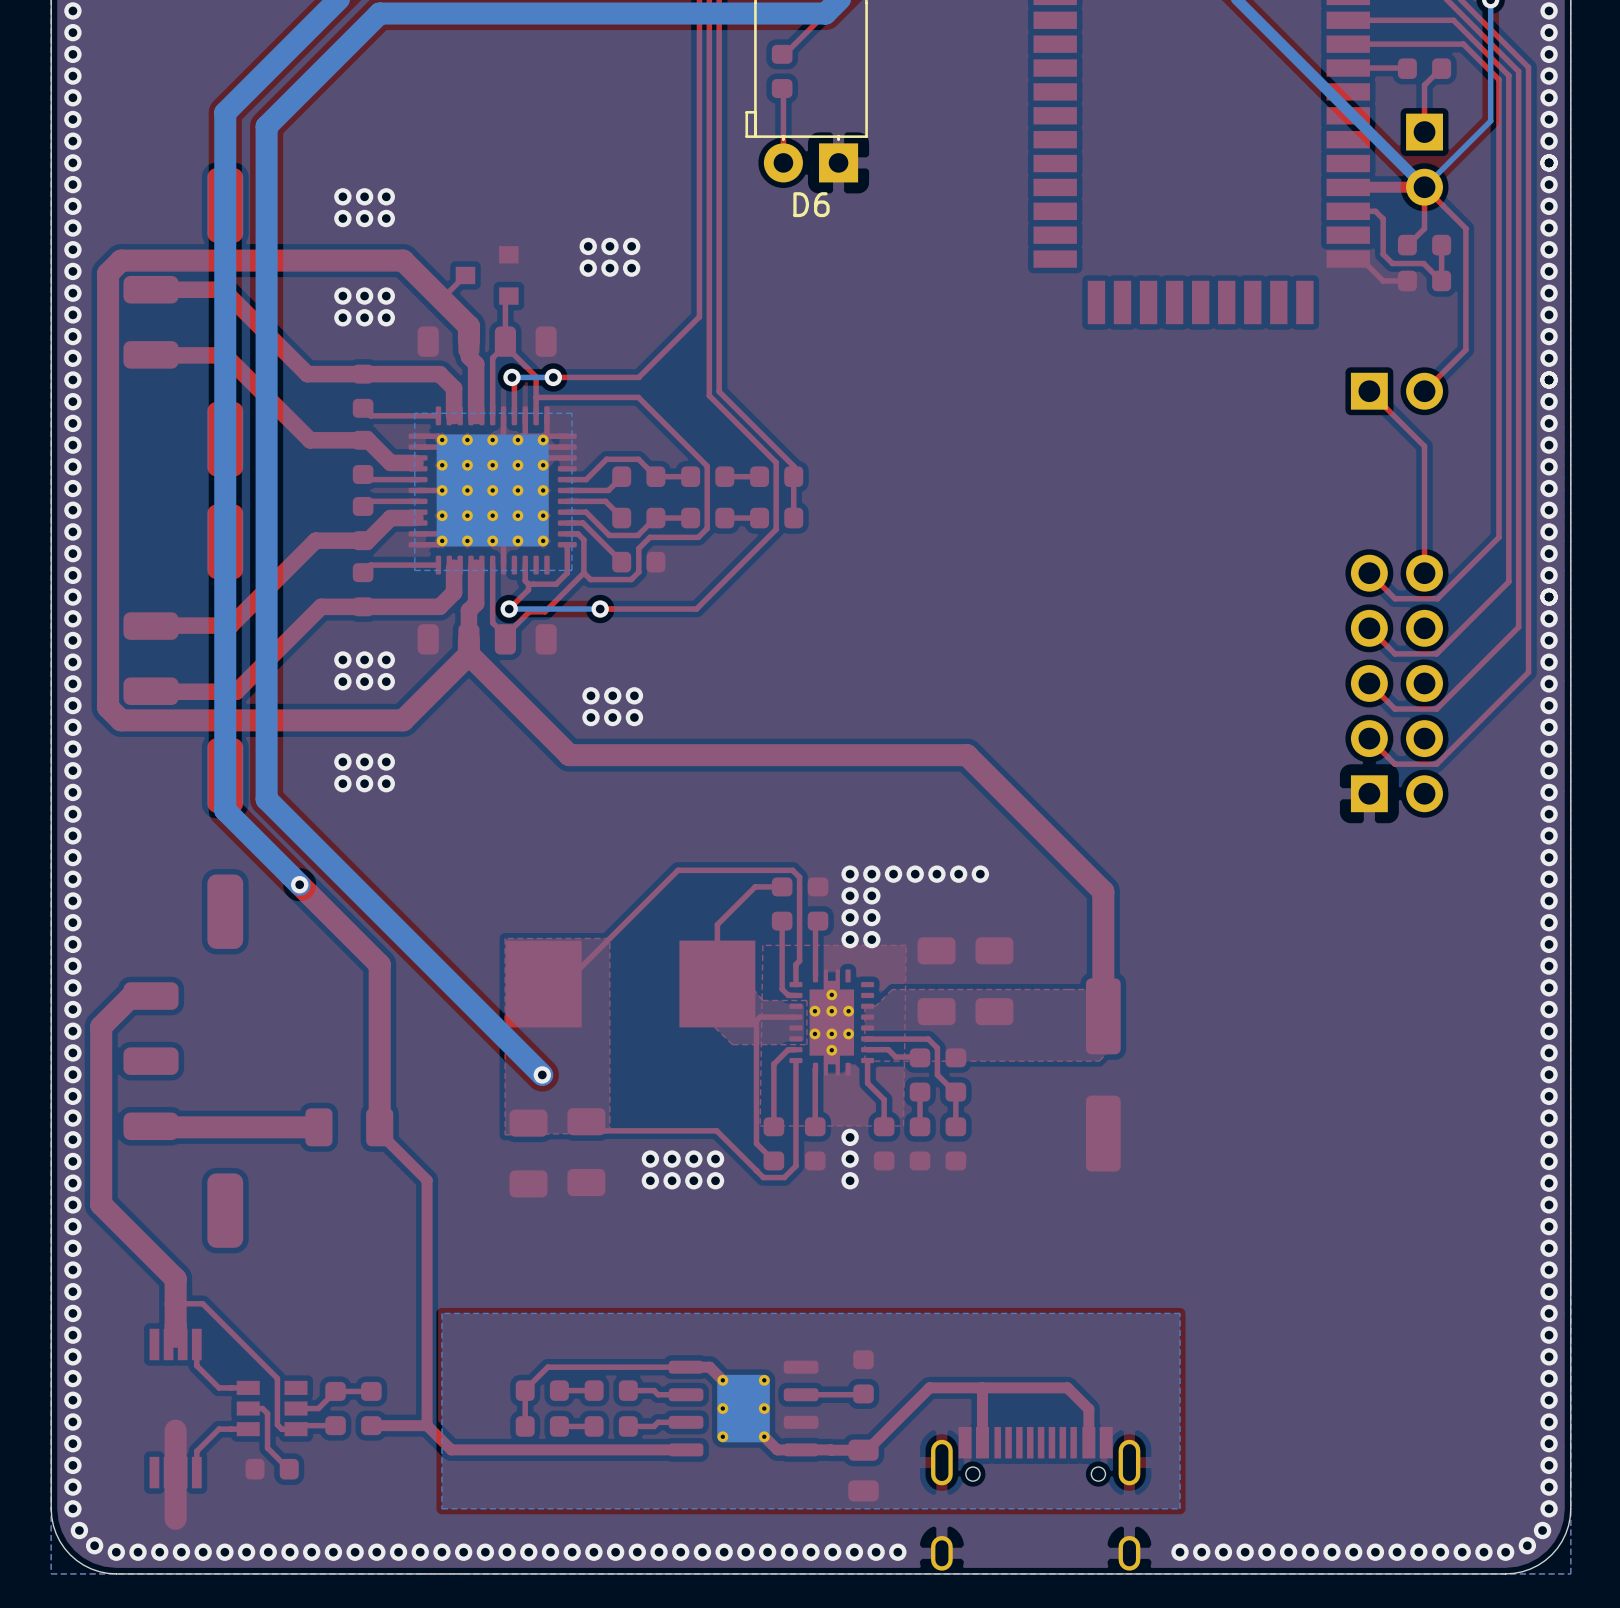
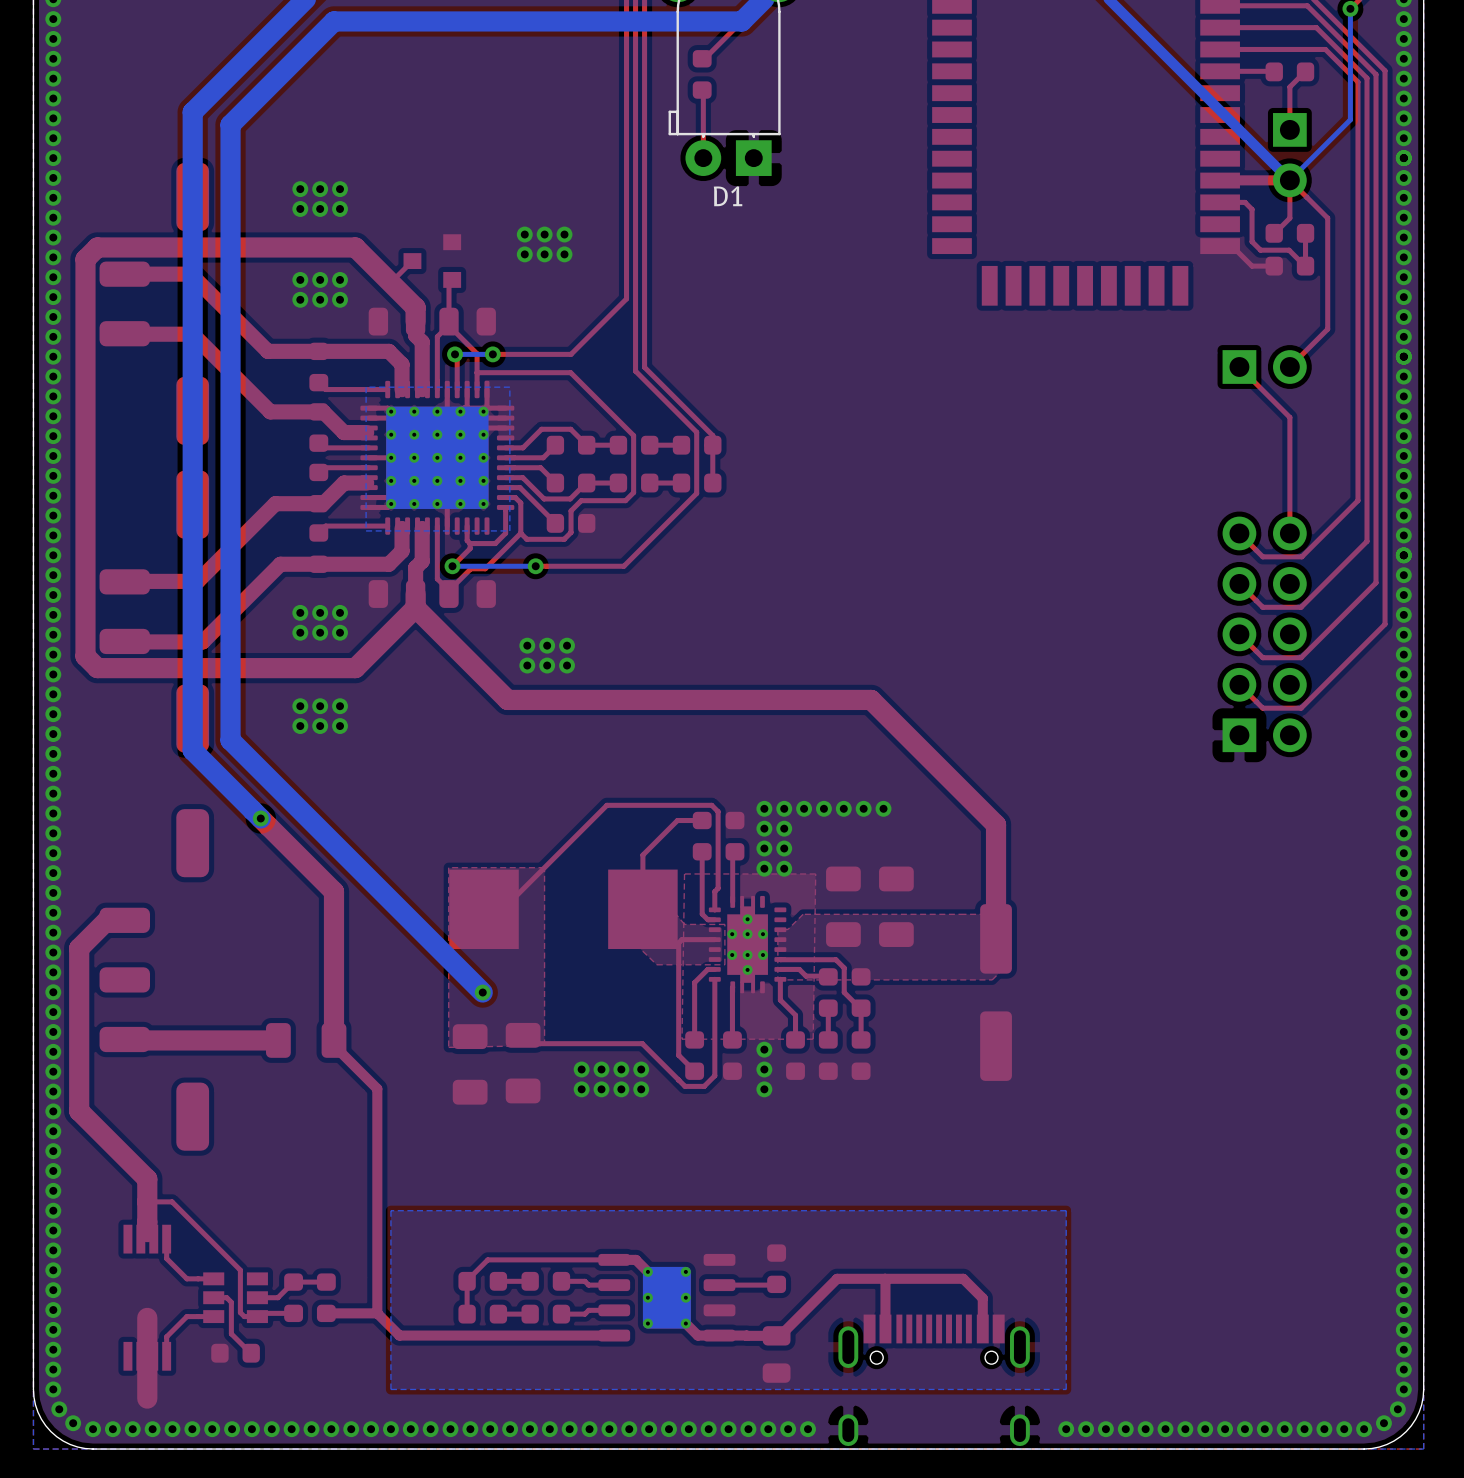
D6 name: D6 (811, 204) -> D1 (728, 196)

